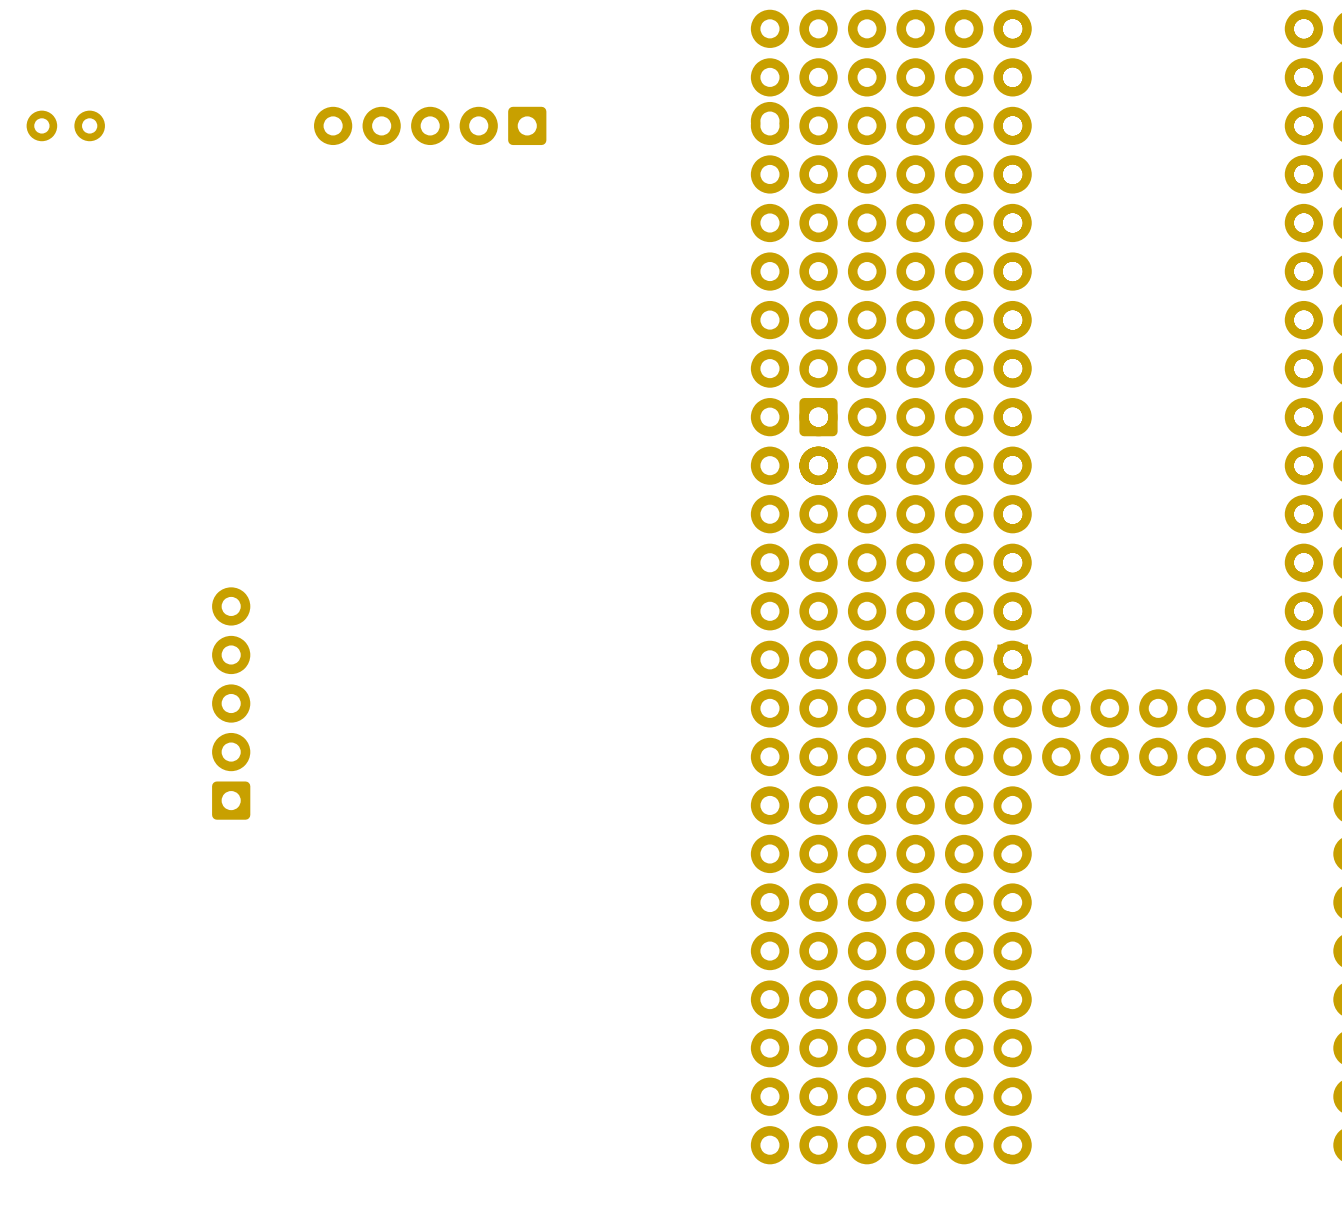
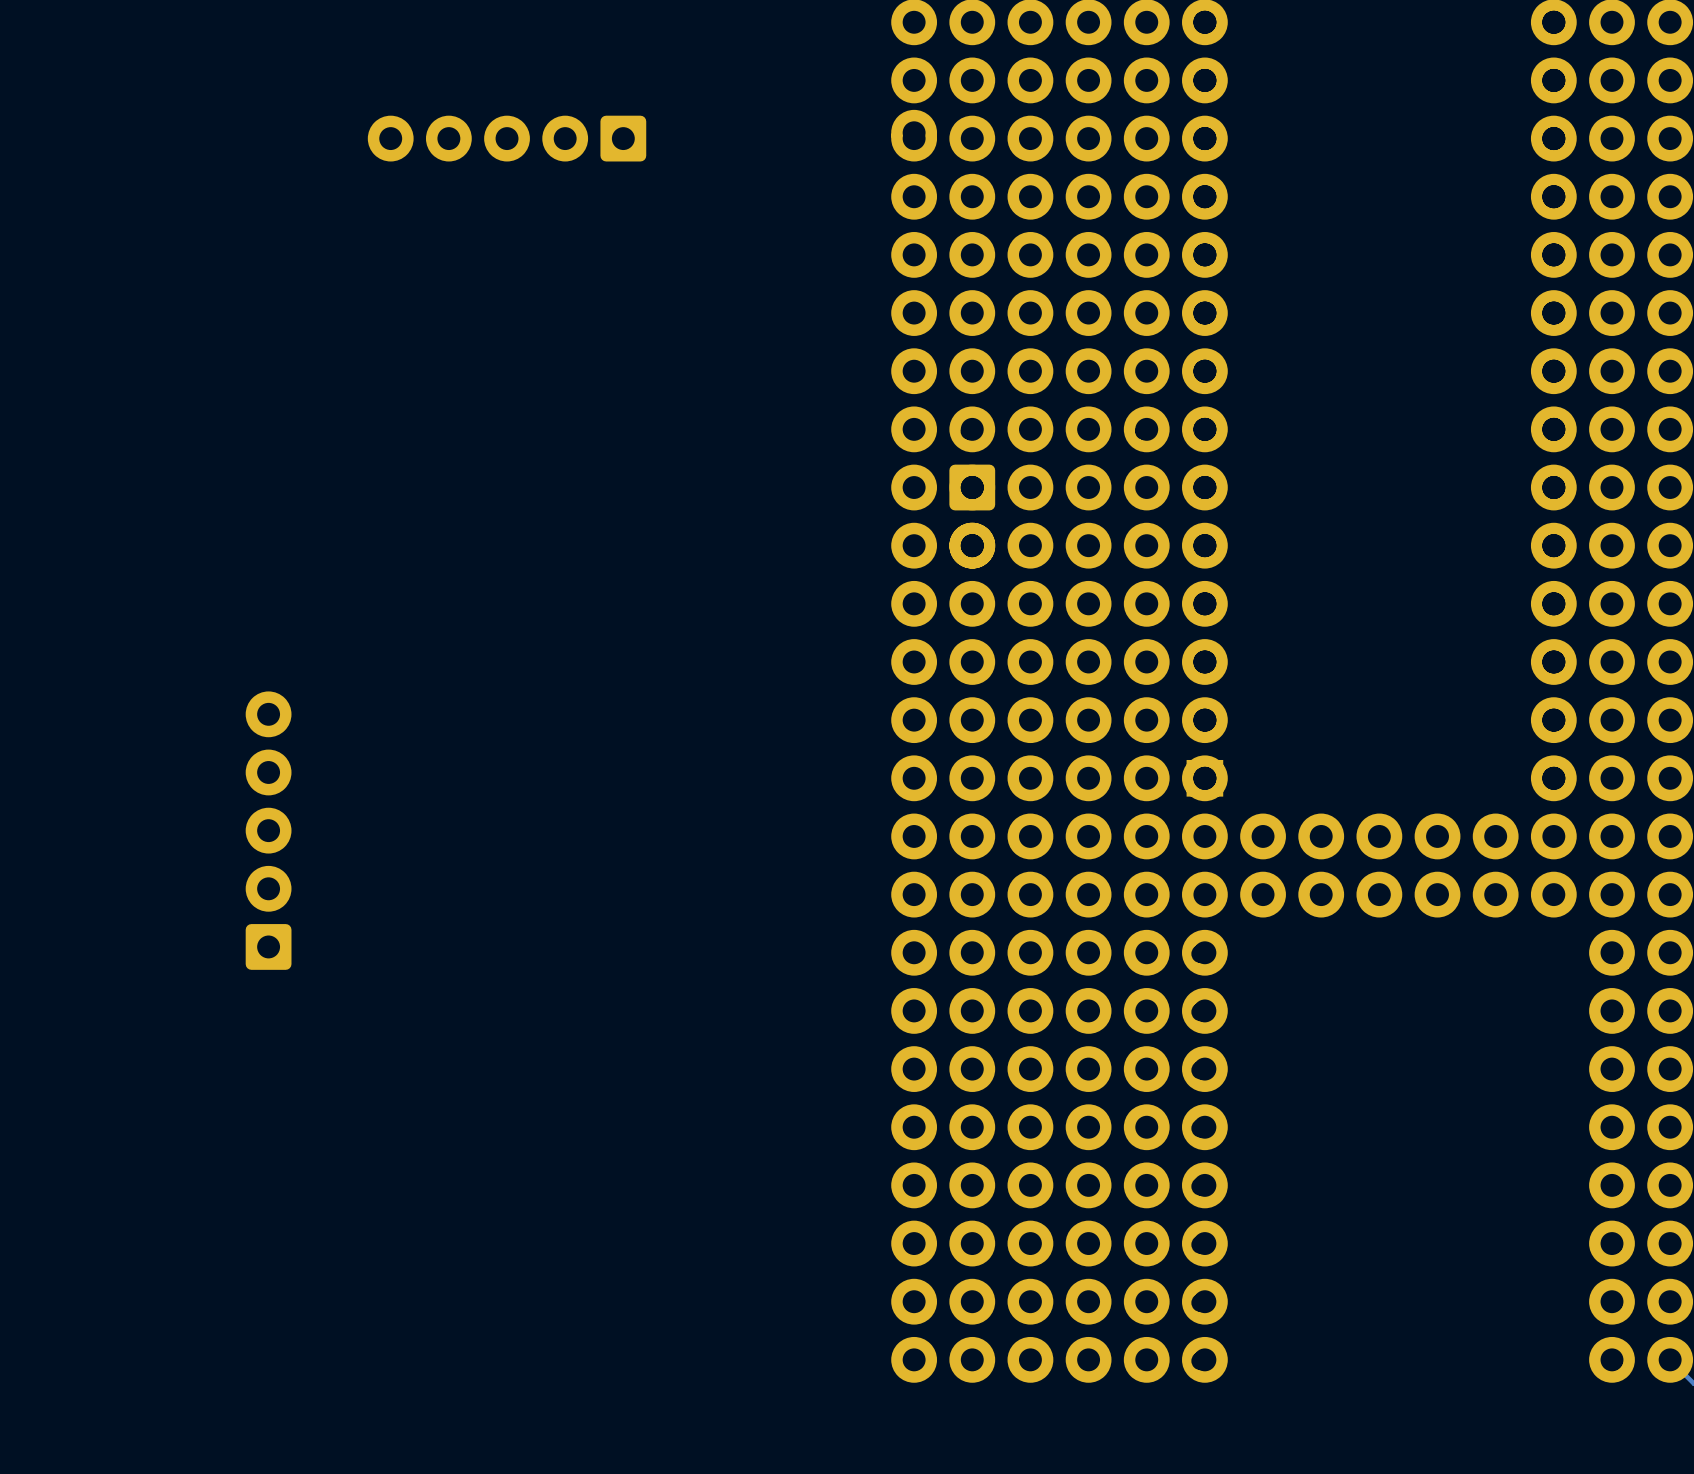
part: (65, 125) -> none

